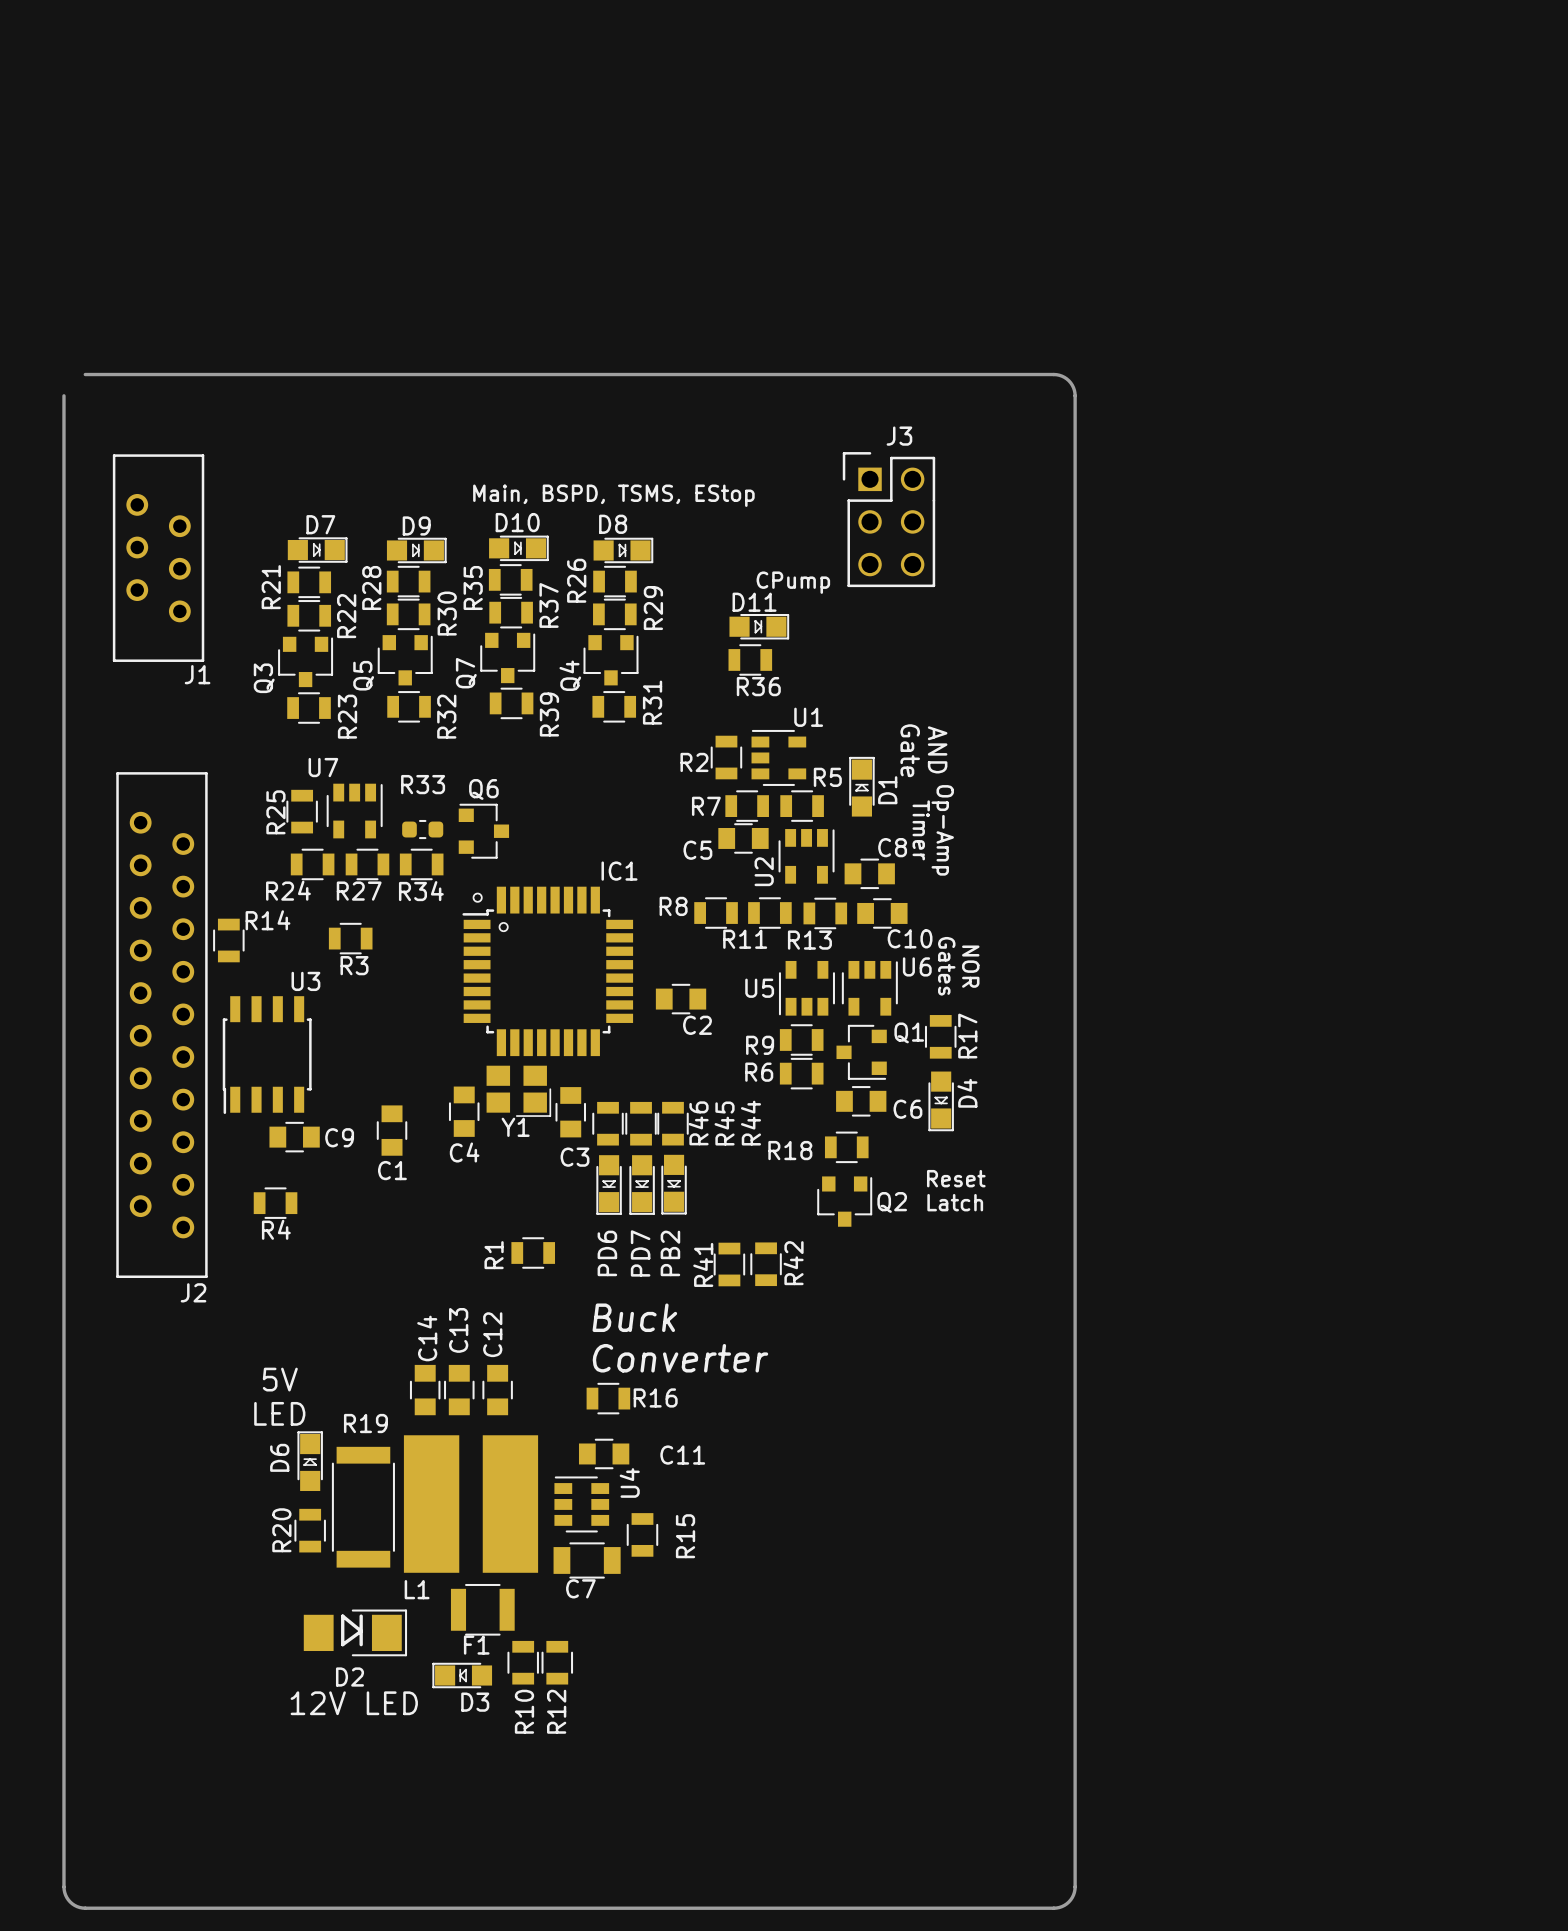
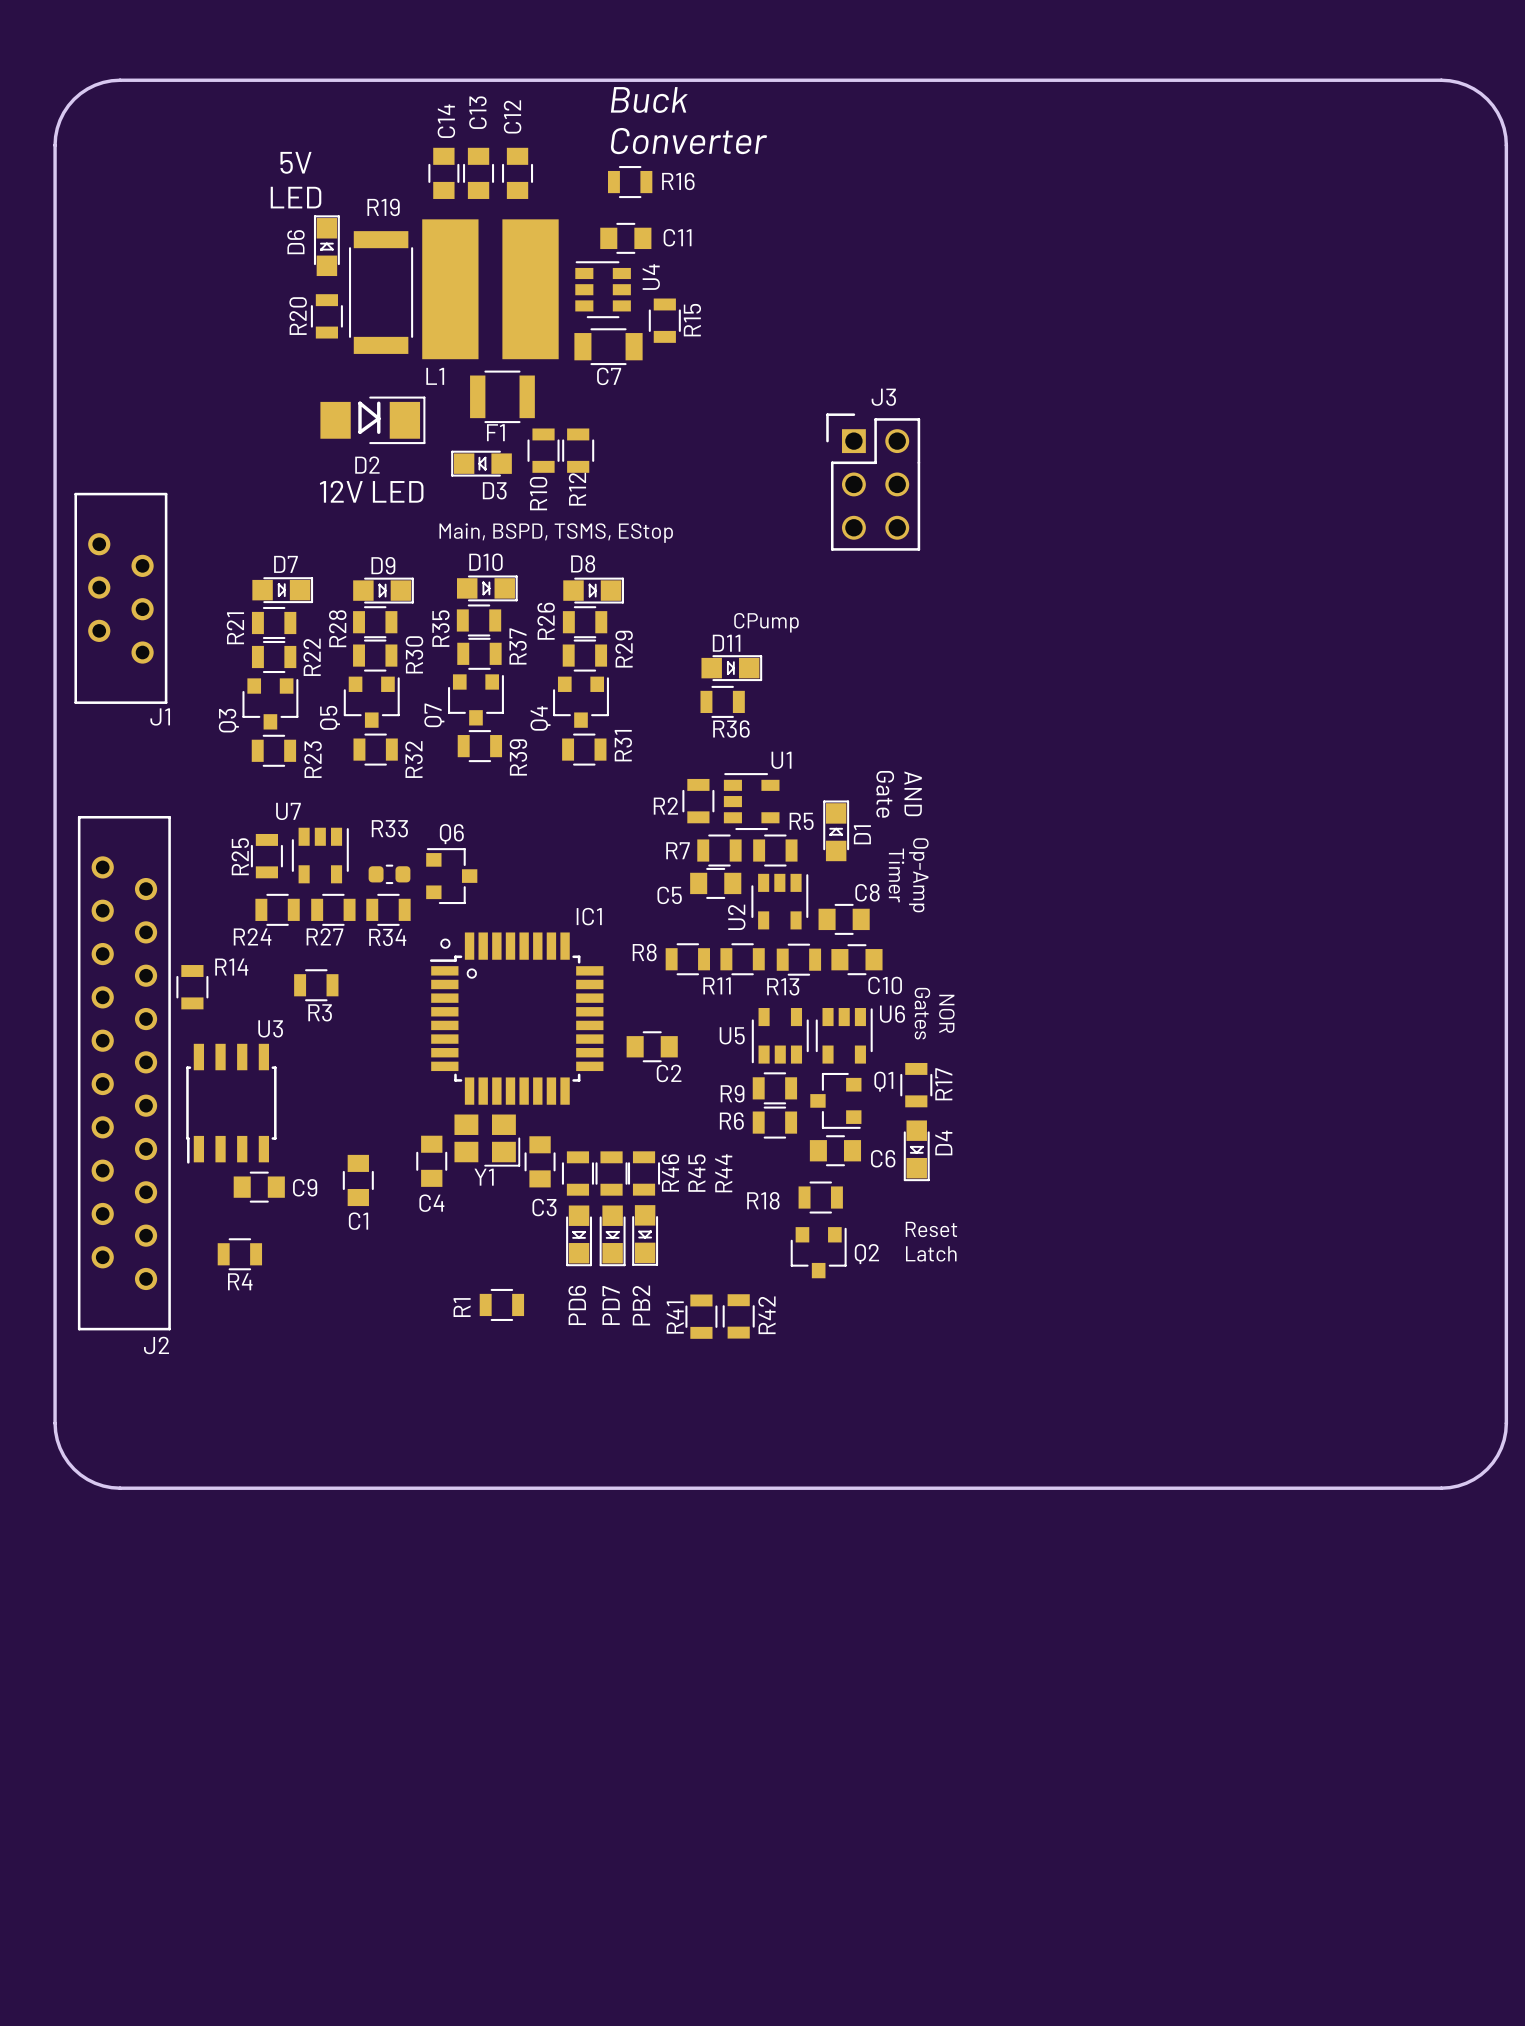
board edge: none -> (120, 80) (1441, 80) (1466, 85) (1487, 99) (1501, 120) (1506, 145) (1506, 1423) (1501, 1448) (1487, 1469) (1466, 1483) (1441, 1488) (120, 1488) (95, 1483) (74, 1469) (60, 1448) (55, 1423) (55, 145) (60, 120) (74, 99) (95, 85) (120, 80)
text: none -> Buck (649, 99)
text: none -> Converter (688, 141)
text: none -> 5V (296, 162)
text: none -> LED (296, 197)
board edge: (85, 374) (1053, 374) (1064, 377) (1072, 385) (1075, 395) (1075, 1886) (1072, 1897) (1064, 1905) (1053, 1908) (85, 1908) (74, 1905) (66, 1897) (63, 1886) (63, 395) -> none
text: none -> 12V LED (371, 491)
text position: Main, BSPD, TSMS, EStop (613, 495) -> Main, BSPD, TSMS, EStop (556, 533)
J3 position: (888, 519) -> (873, 482)
text: Buck (634, 1317) -> none
text: Converter (680, 1358) -> none
text: 5V (280, 1379) -> none
C14 position: (425, 1390) -> (443, 173)
C13 position: (459, 1390) -> (478, 173)
C12 position: (497, 1390) -> (517, 173)
R16 position: (608, 1398) -> (630, 182)
text: LED (279, 1413) -> none
C11 position: (604, 1453) -> (625, 238)
C11 name position: C11 (682, 1455) -> C11 (677, 237)
D6 position: (310, 1461) -> (326, 245)
U4 name position: U4 (629, 1482) -> U4 (651, 277)
L1 position: (471, 1504) -> (490, 289)
U4 position: (581, 1504) -> (603, 289)
R19 position: (363, 1507) -> (381, 292)
R20 position: (310, 1530) -> (326, 316)
R15 position: (642, 1534) -> (664, 320)
R15 name position: R15 (685, 1536) -> R15 (692, 320)
C7 position: (587, 1560) -> (608, 346)
C7 name position: C7 (580, 1588) -> C7 (609, 376)
F1 position: (482, 1609) -> (502, 396)
D2 position: (355, 1632) -> (372, 420)
R10 position: (523, 1662) -> (543, 450)
R12 position: (557, 1662) -> (578, 450)
D3 position: (462, 1675) -> (481, 463)
text: 12V LED (354, 1703) -> none
R10 name position: R10 (524, 1711) -> R10 (538, 493)
R12 name position: R12 (556, 1711) -> R12 (577, 489)

